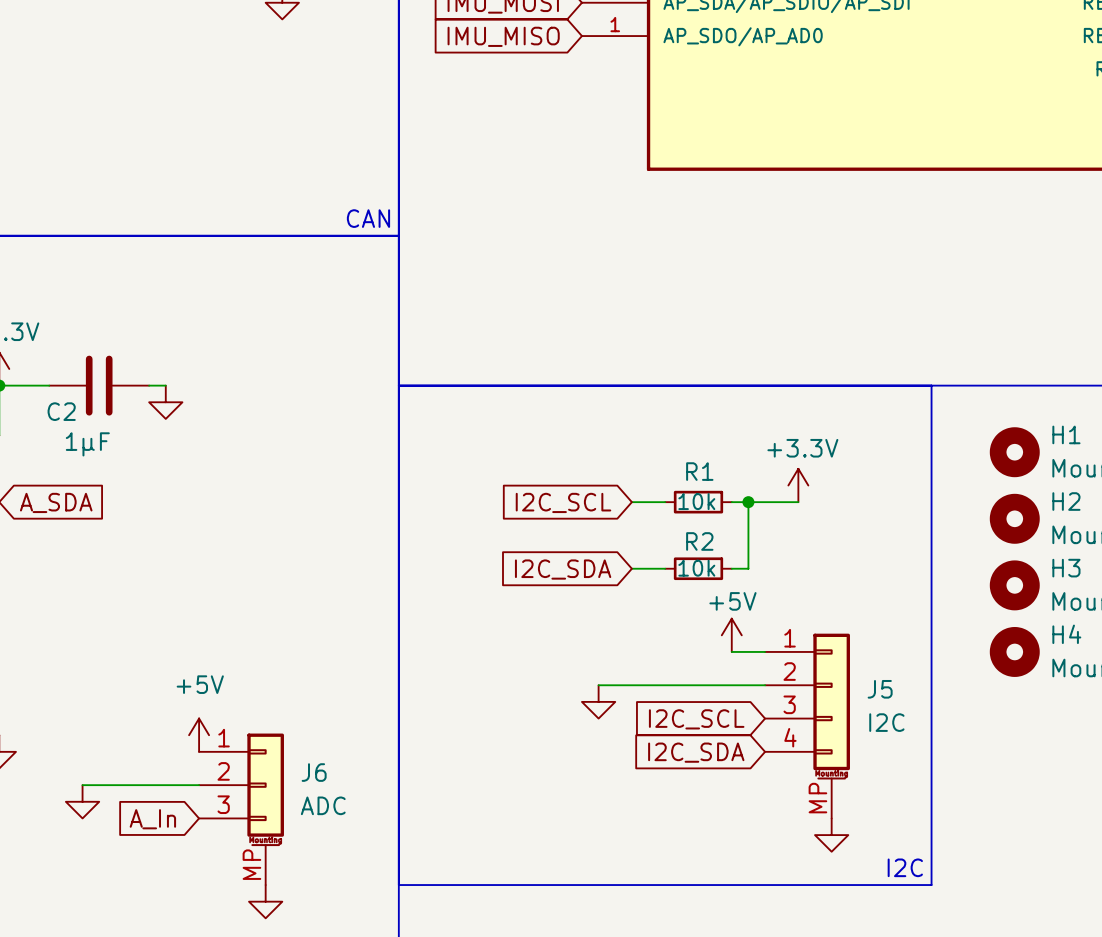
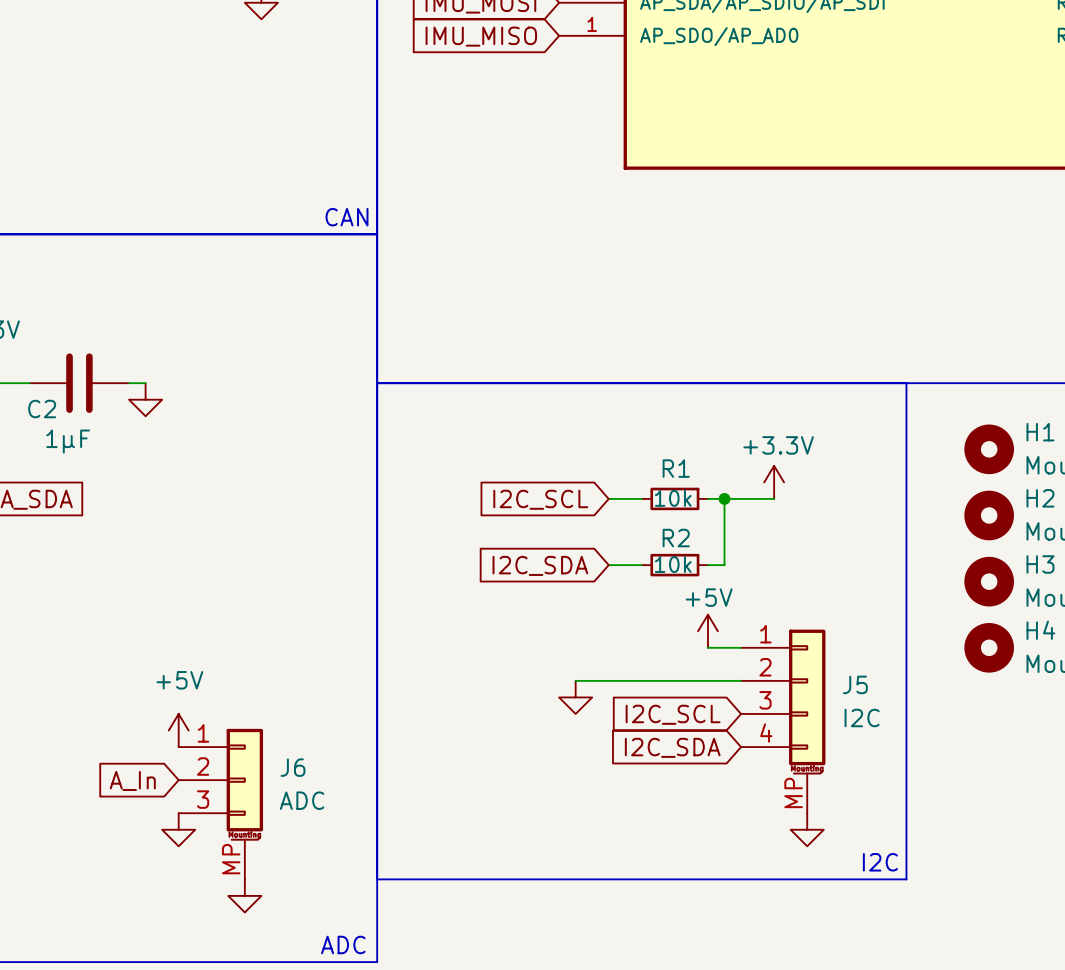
wire: (82, 785) (199, 785) -> none
power symbol position: (82, 801) -> (178, 829)
global label position: A_In (152, 819) -> A_In (132, 780)

